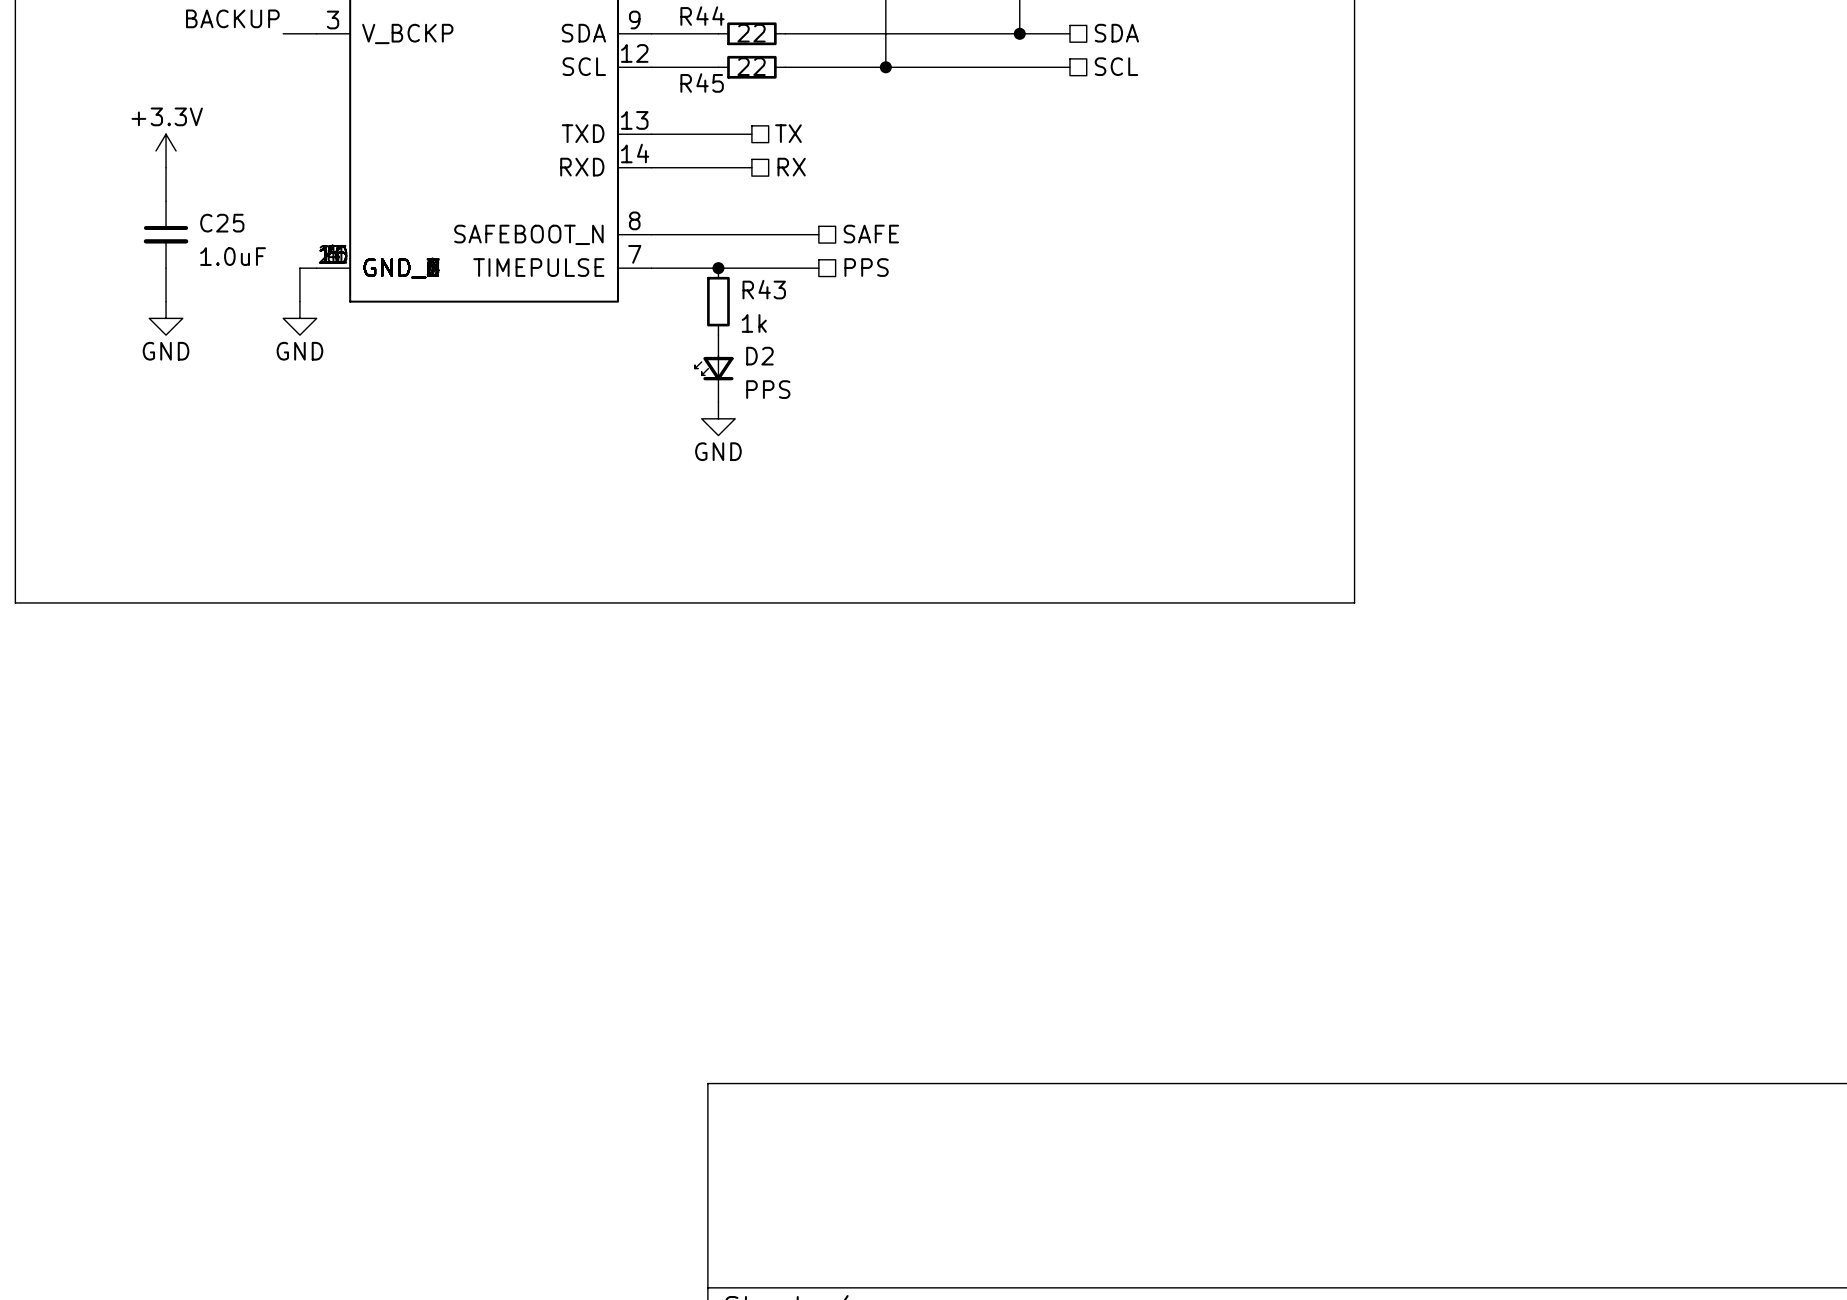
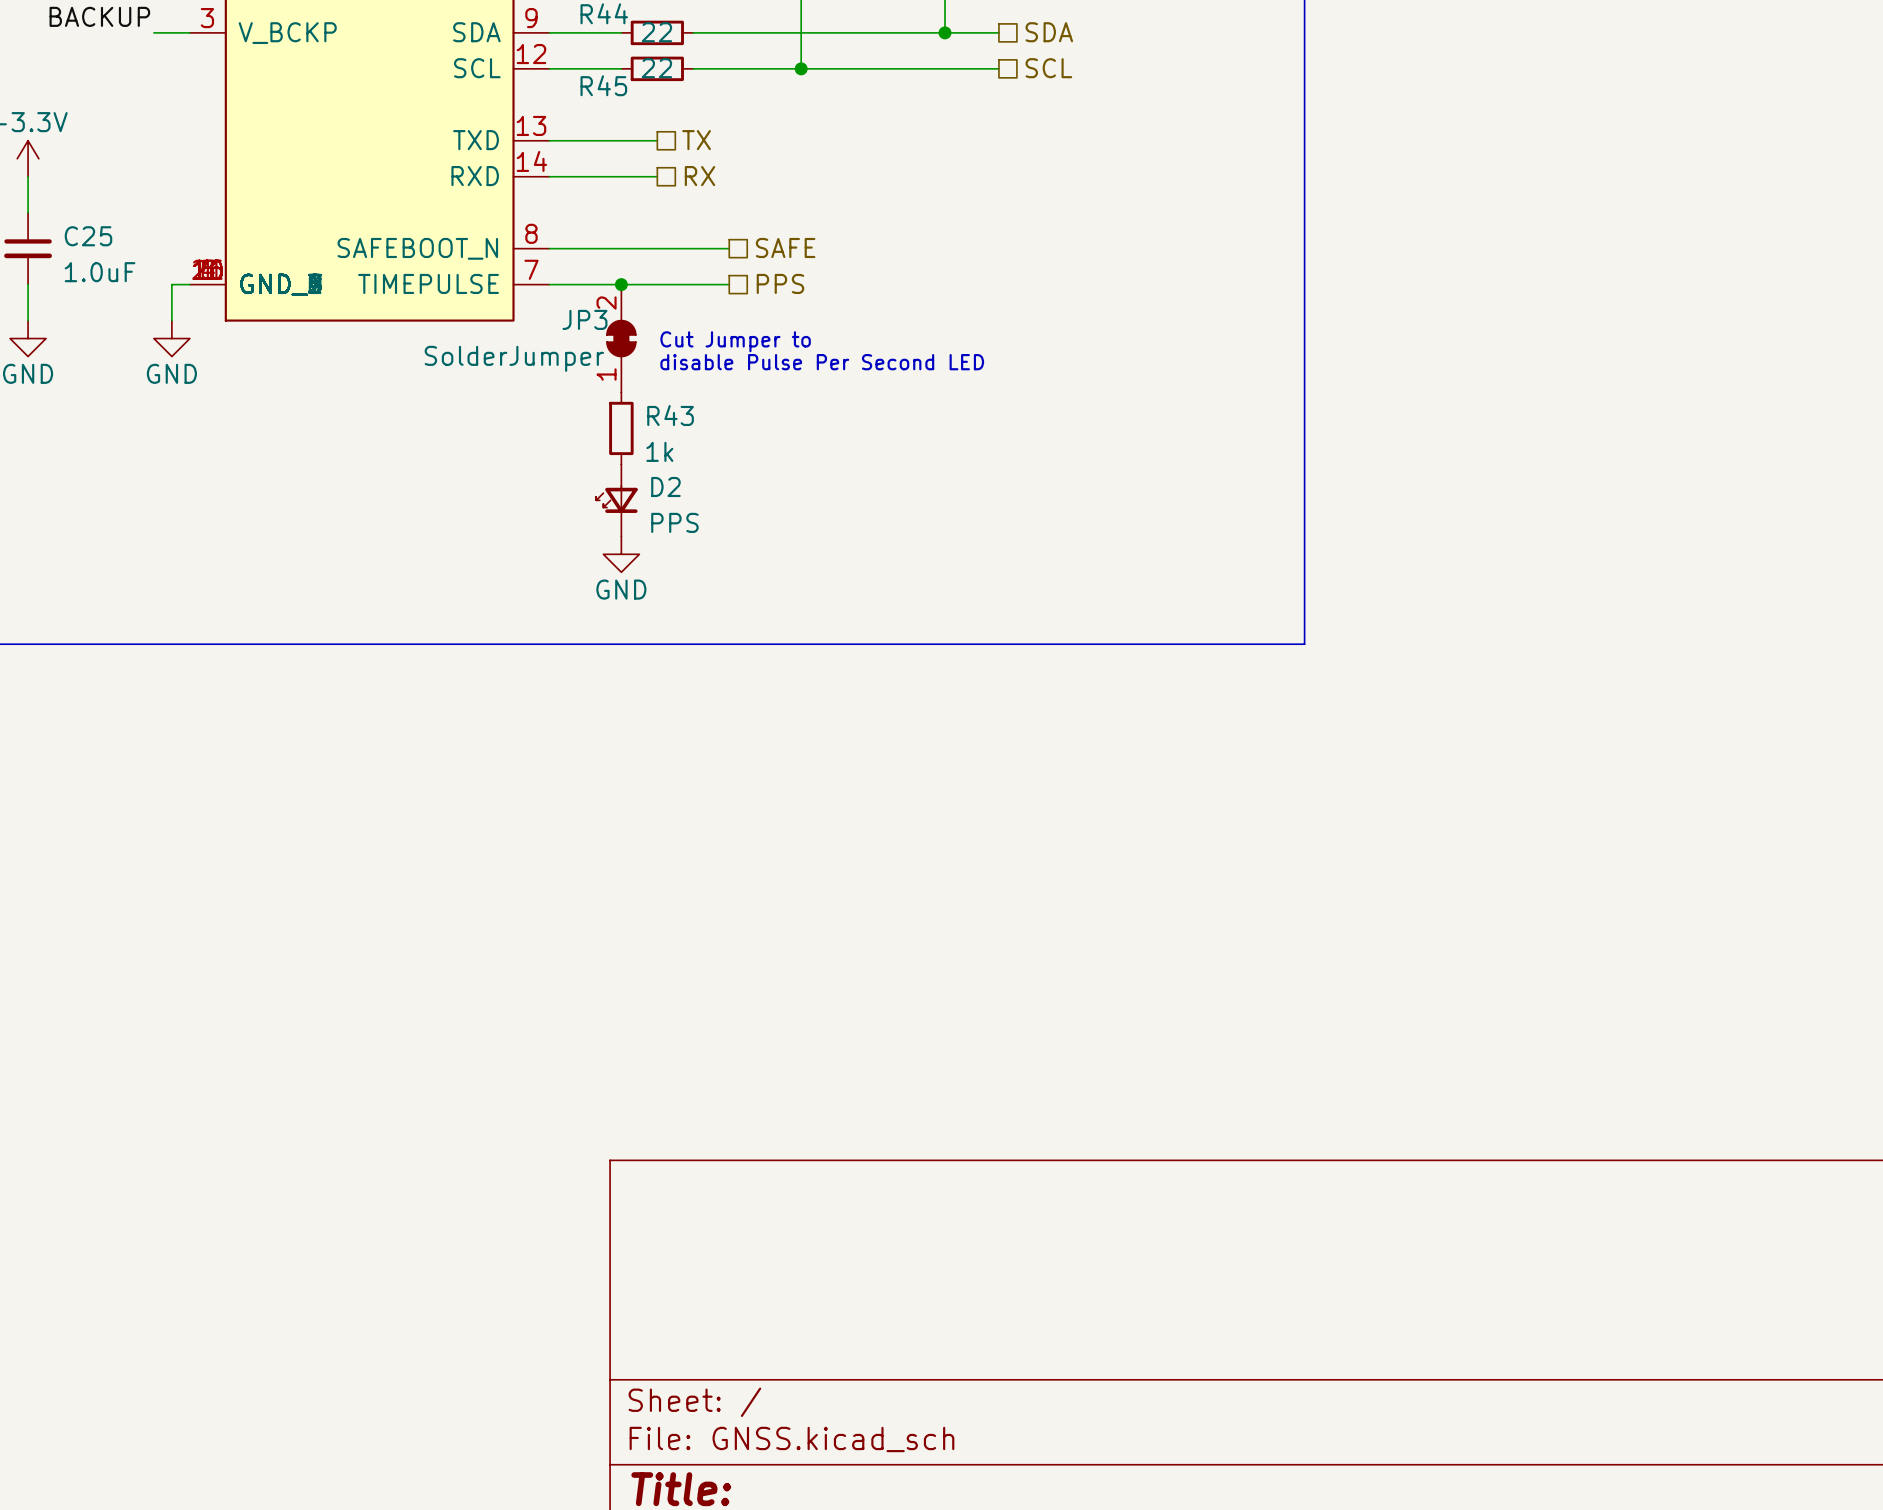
R43 position: (718, 301) -> (621, 428)
JP3: none -> SolderJumper (621, 338)
text: none -> Cut Jumper to (735, 341)
text: none -> disable Pulse Per Second LED (822, 362)
D2 position: (714, 368) -> (616, 500)
power symbol position: GND (718, 418) -> GND (621, 554)

